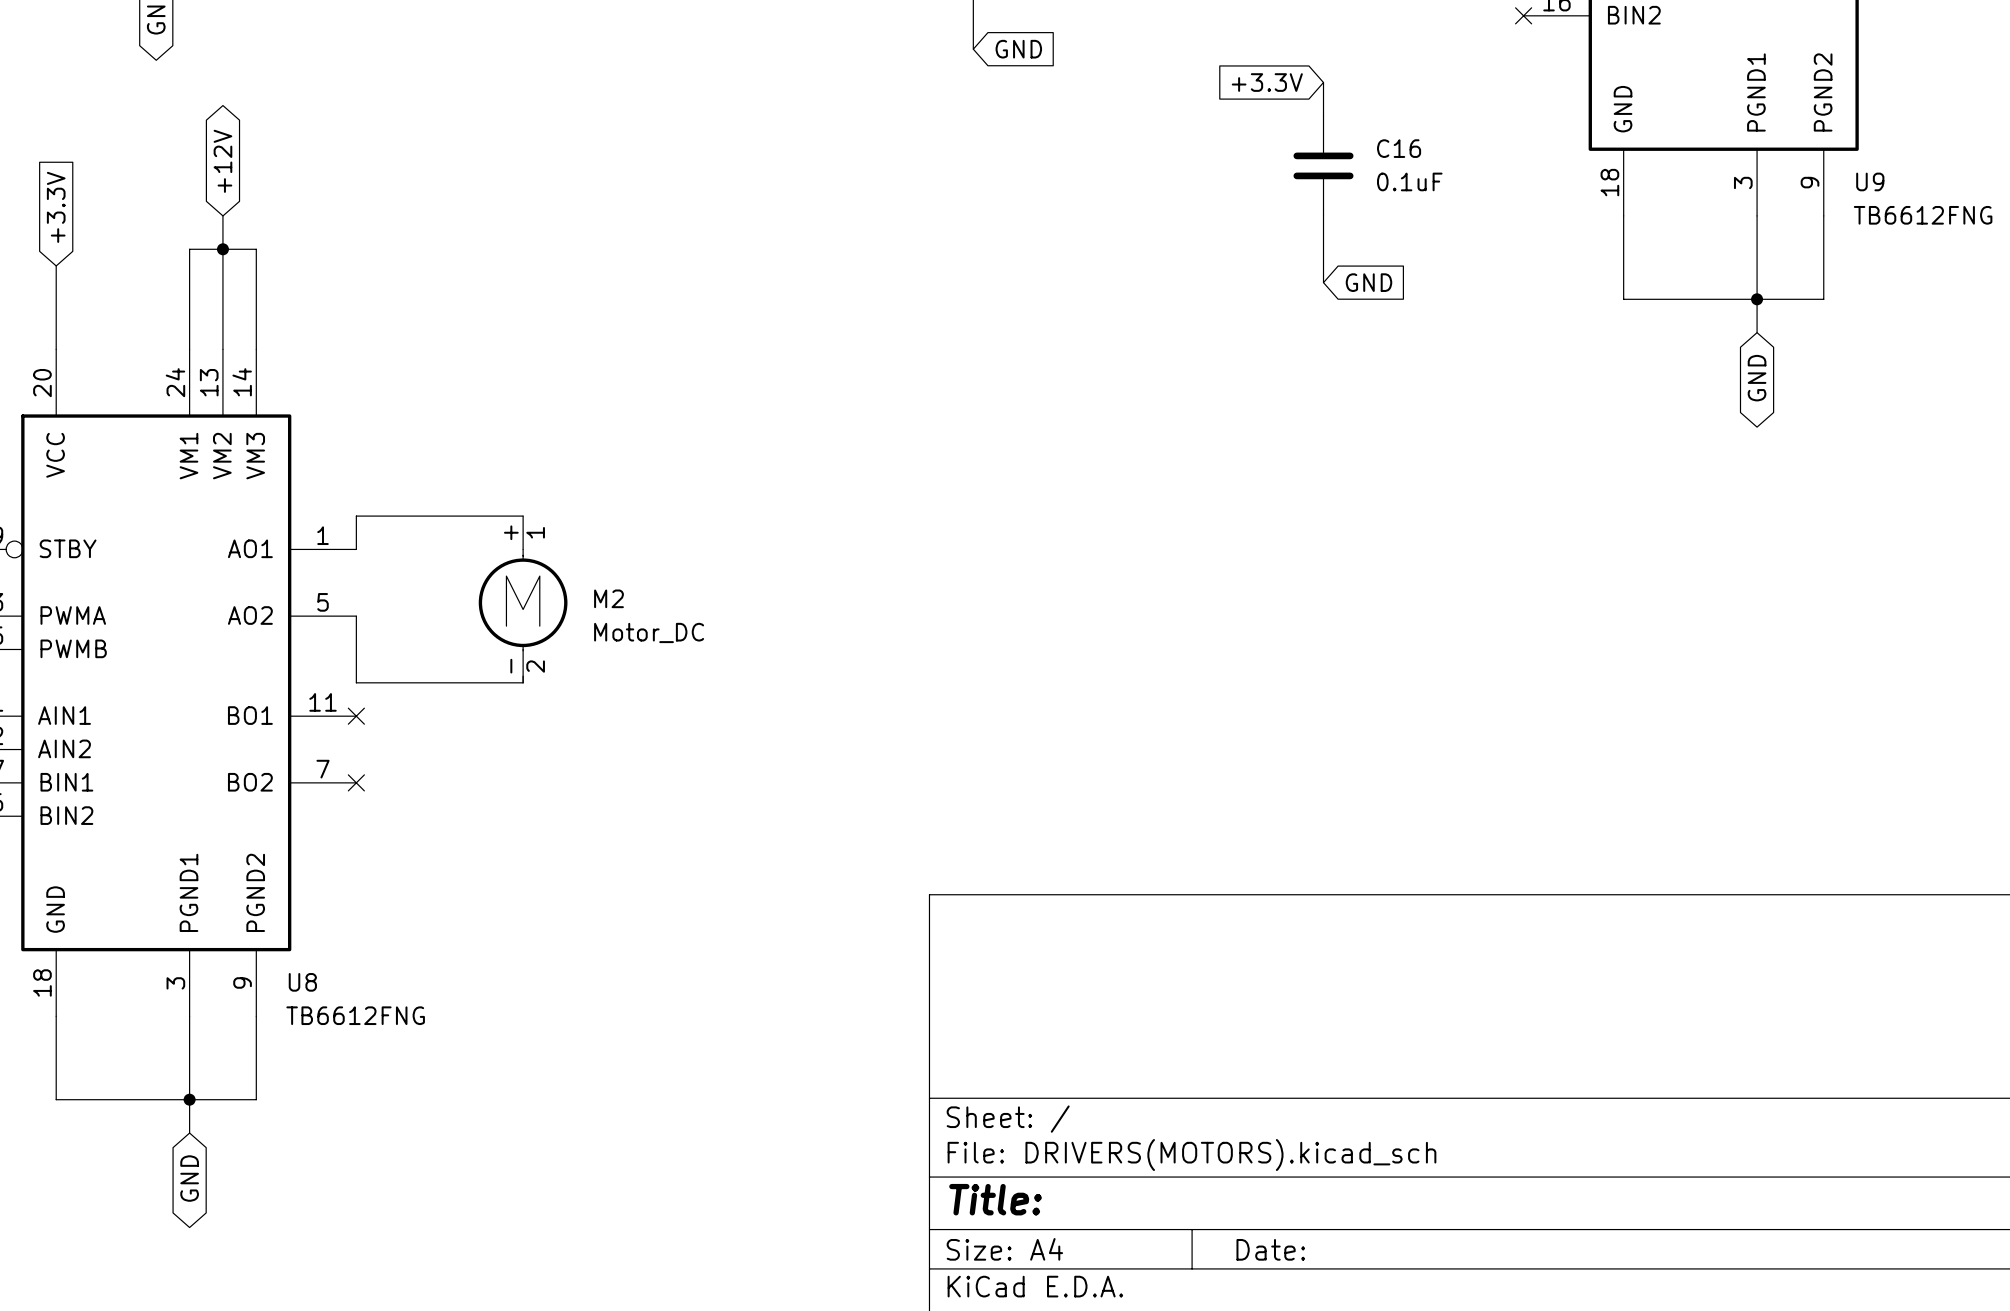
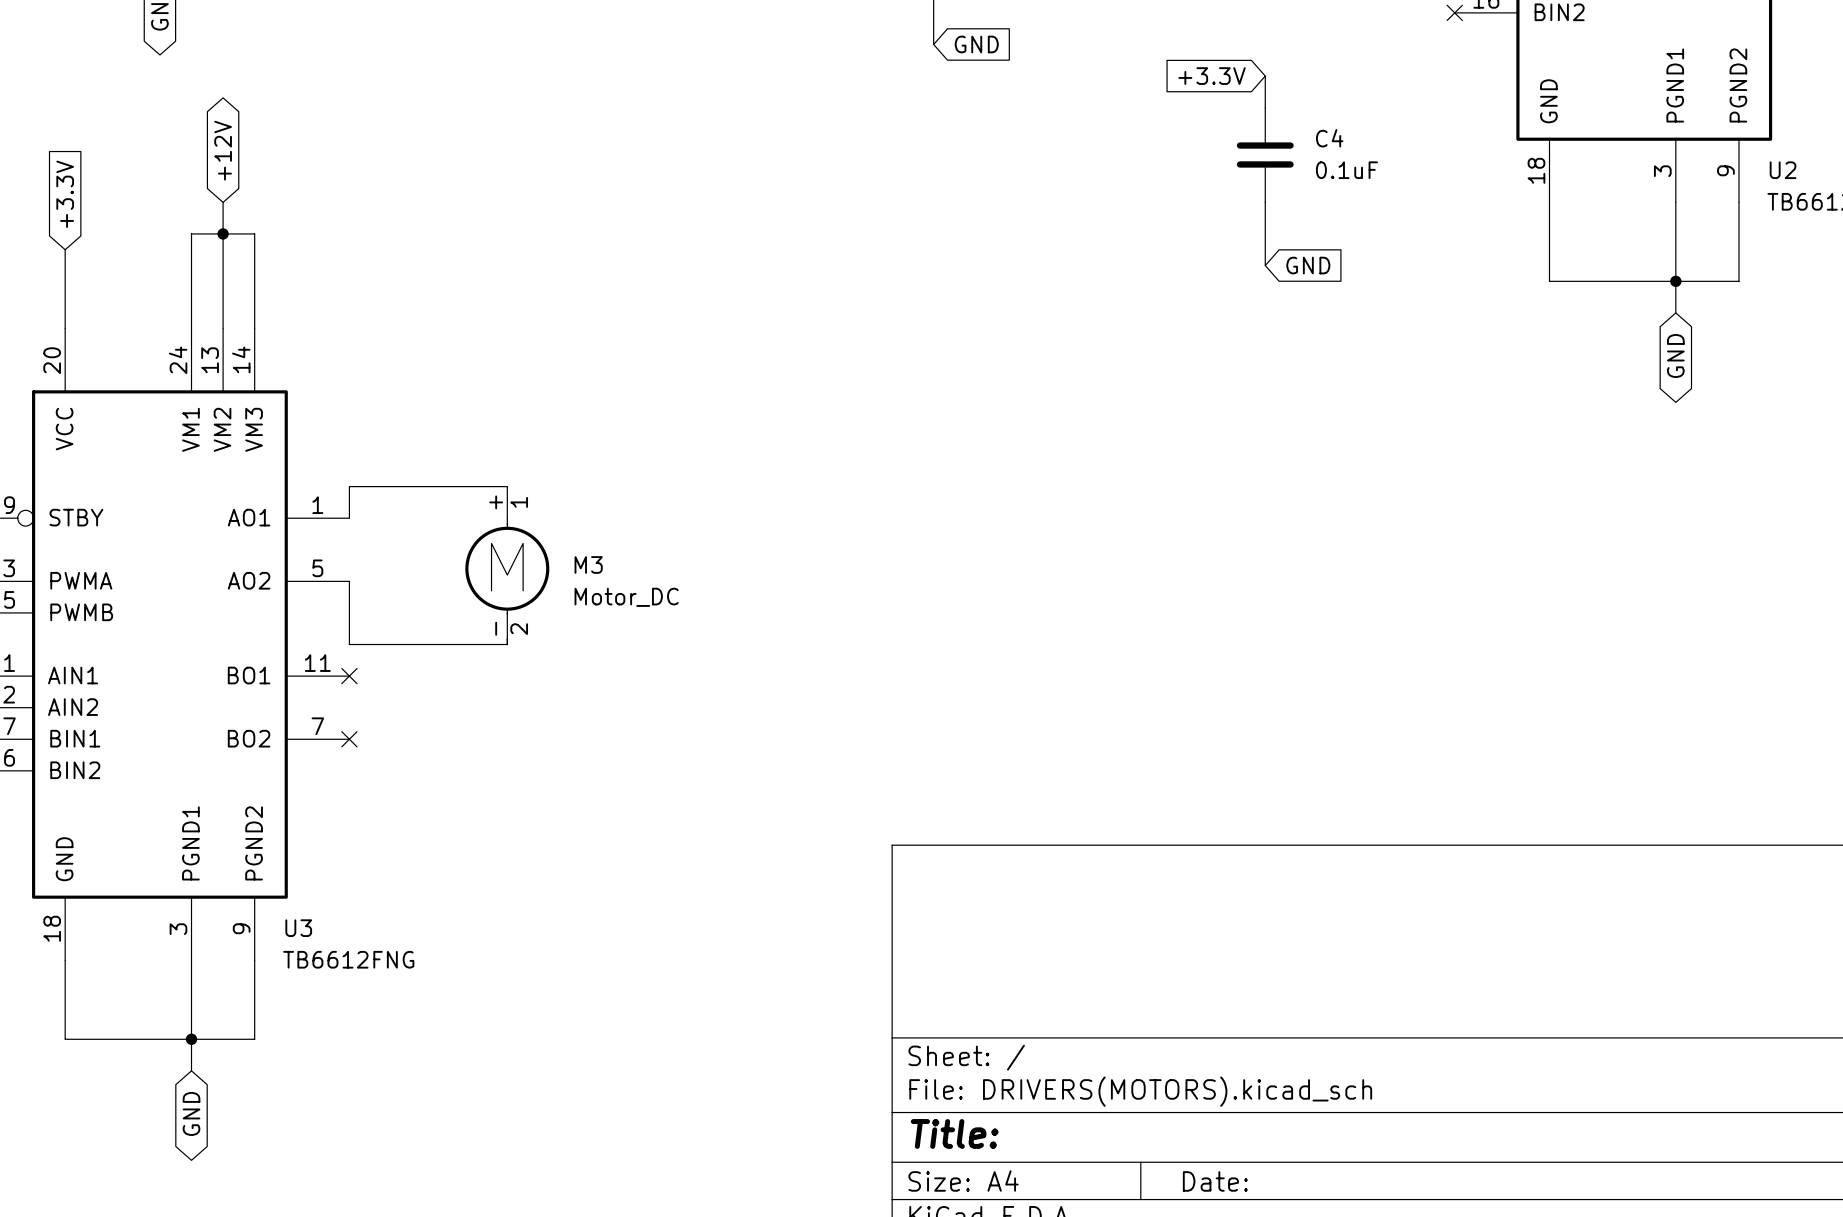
C16 name: C16 (1399, 148) -> C4 (1329, 138)
U9 name: U9 (1870, 181) -> U2 (1783, 170)
M2 name: M2 (608, 598) -> M3 (588, 564)
U8 name: U8 (302, 982) -> U3 (298, 928)

